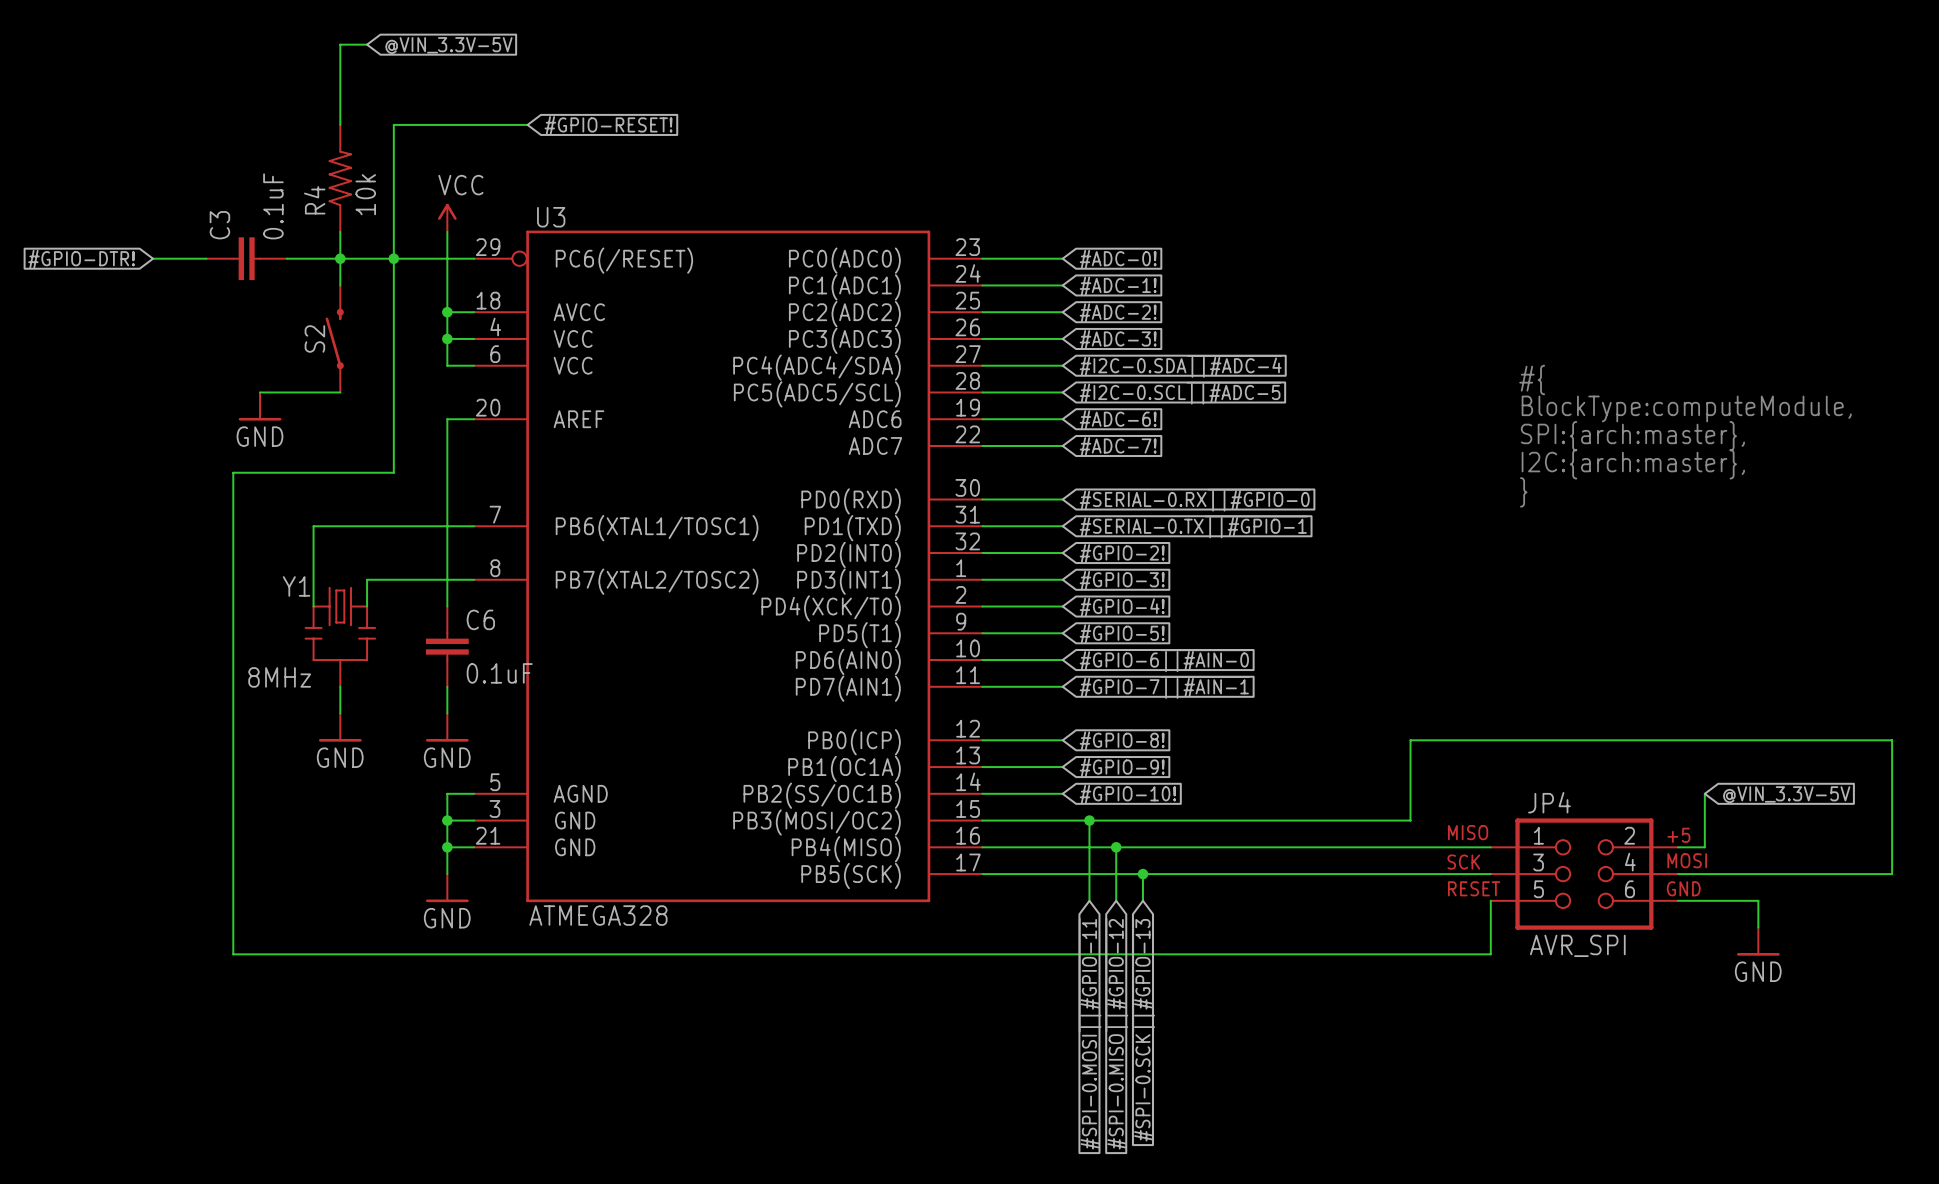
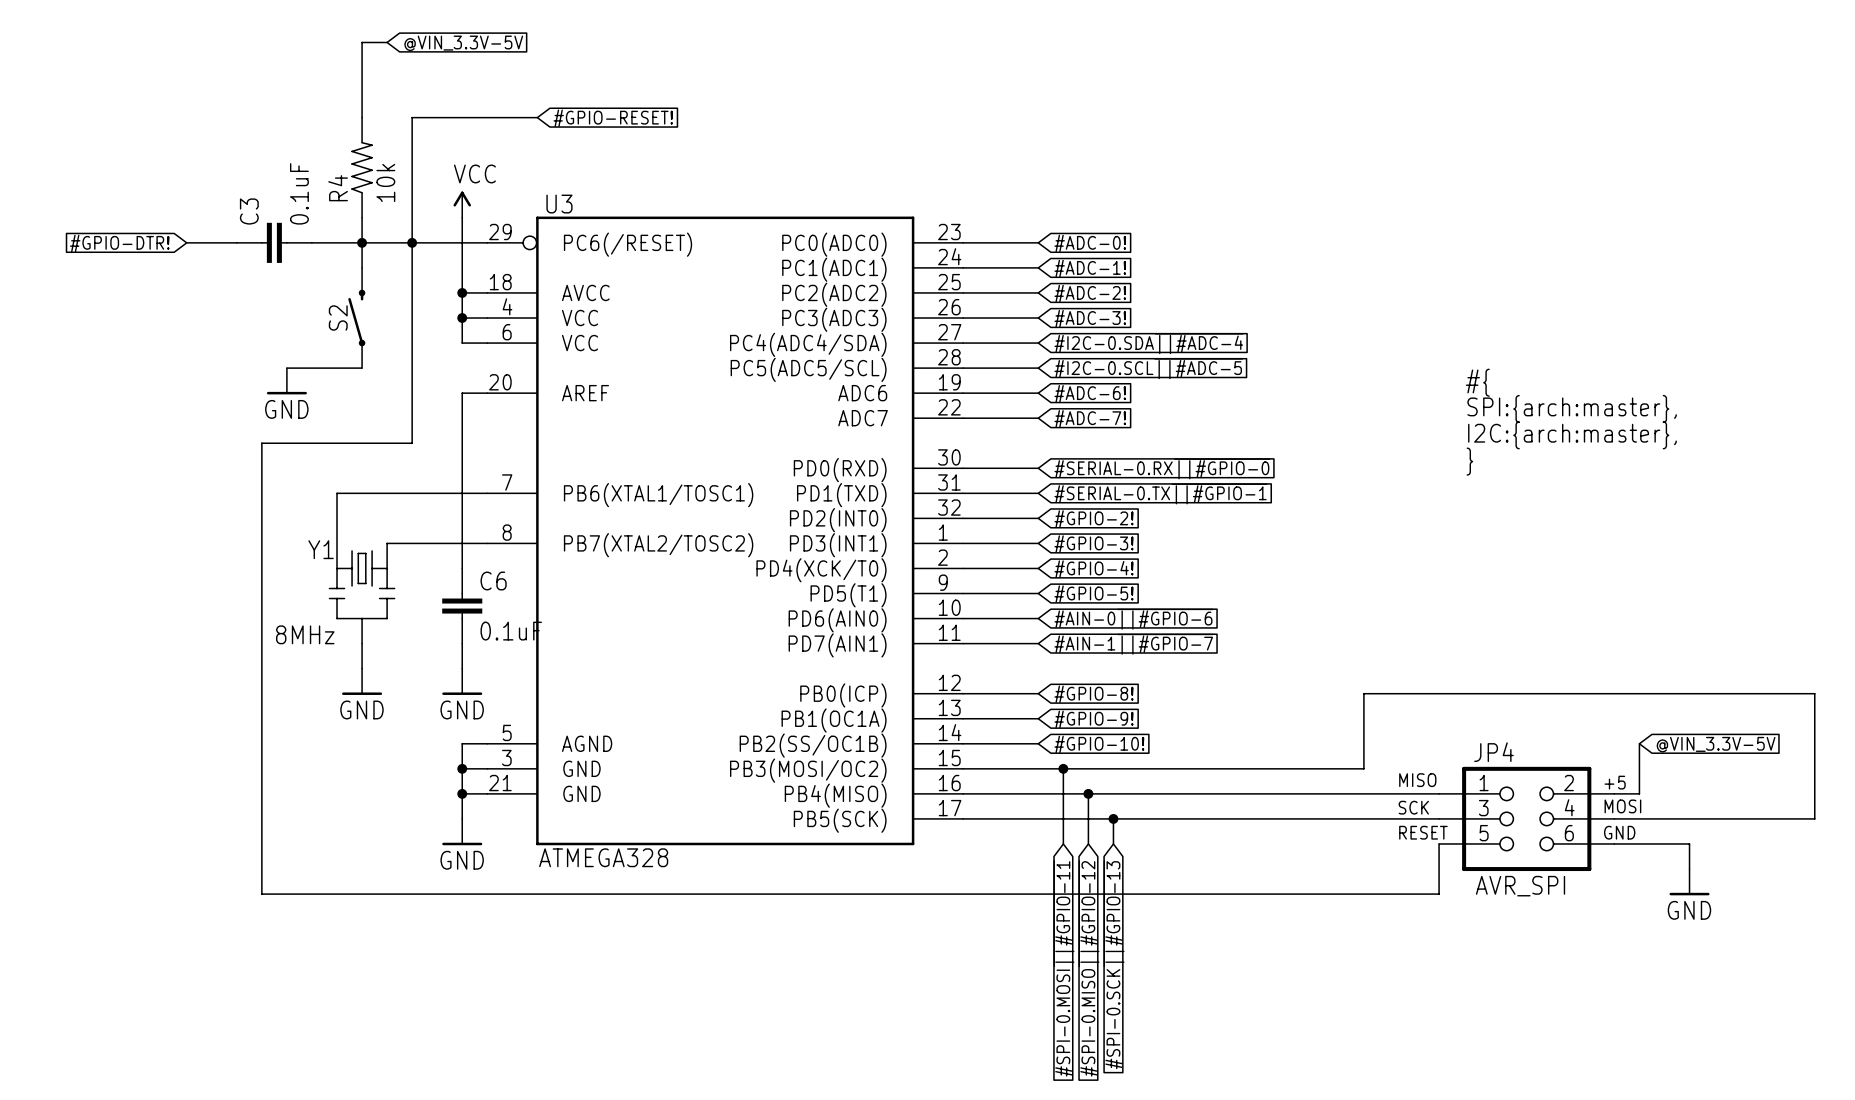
text: #{ (1532, 379) -> none
text: BlockType:computeModule, (1686, 408) -> #{ (1477, 382)
global label: #GPIO-6~{||#AIN-0} (1164, 660) -> #AIN-0~{||#GPIO-6} (1133, 619)
global label: #GPIO-7~{||#AIN-1} (1164, 687) -> #AIN-1~{||#GPIO-7} (1133, 644)

